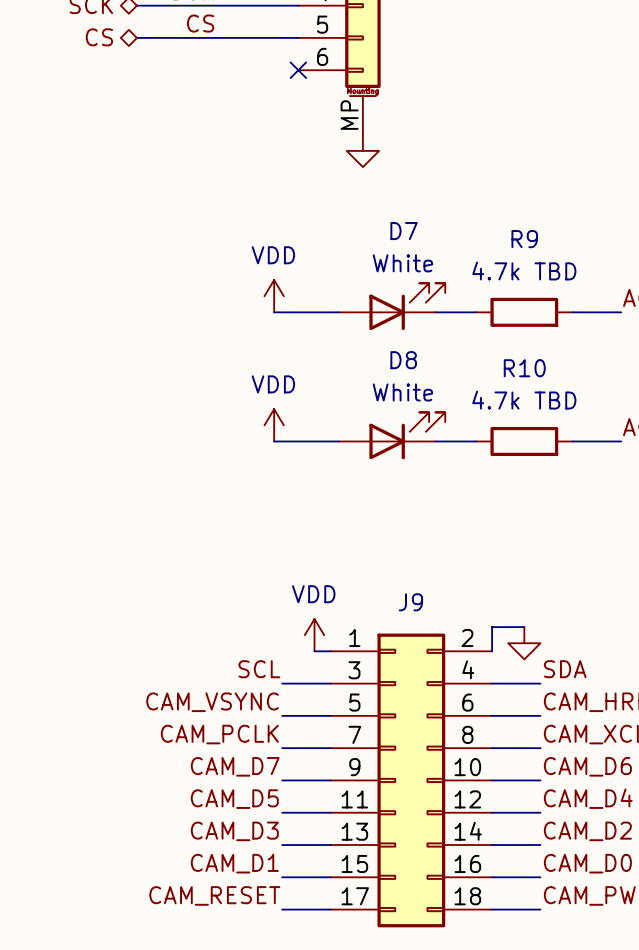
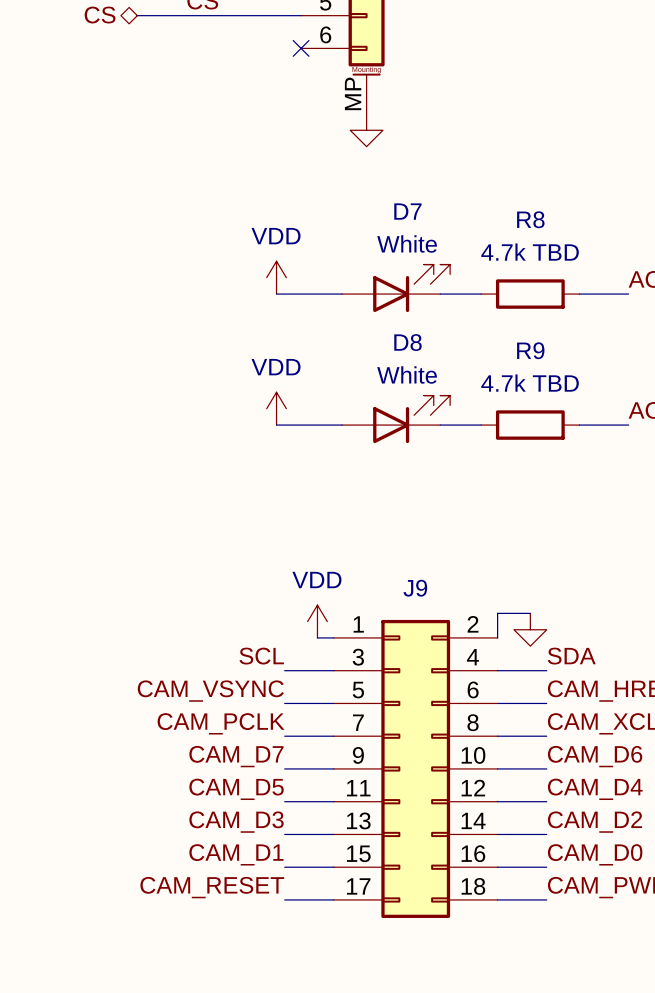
R9 name: R9 (524, 239) -> R8 (530, 219)
R10 name: R10 (524, 368) -> R9 (530, 350)

